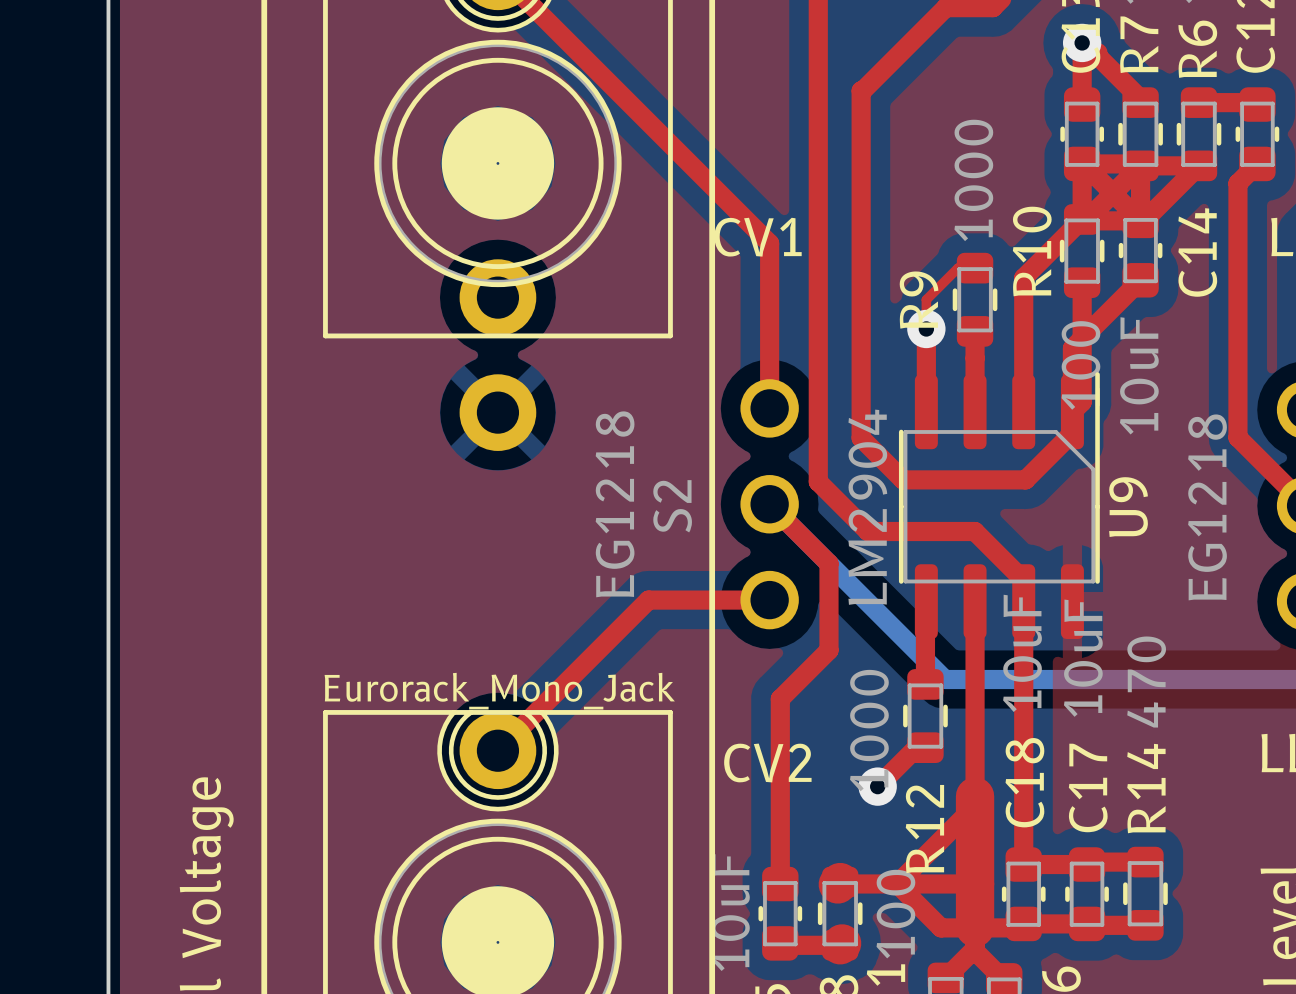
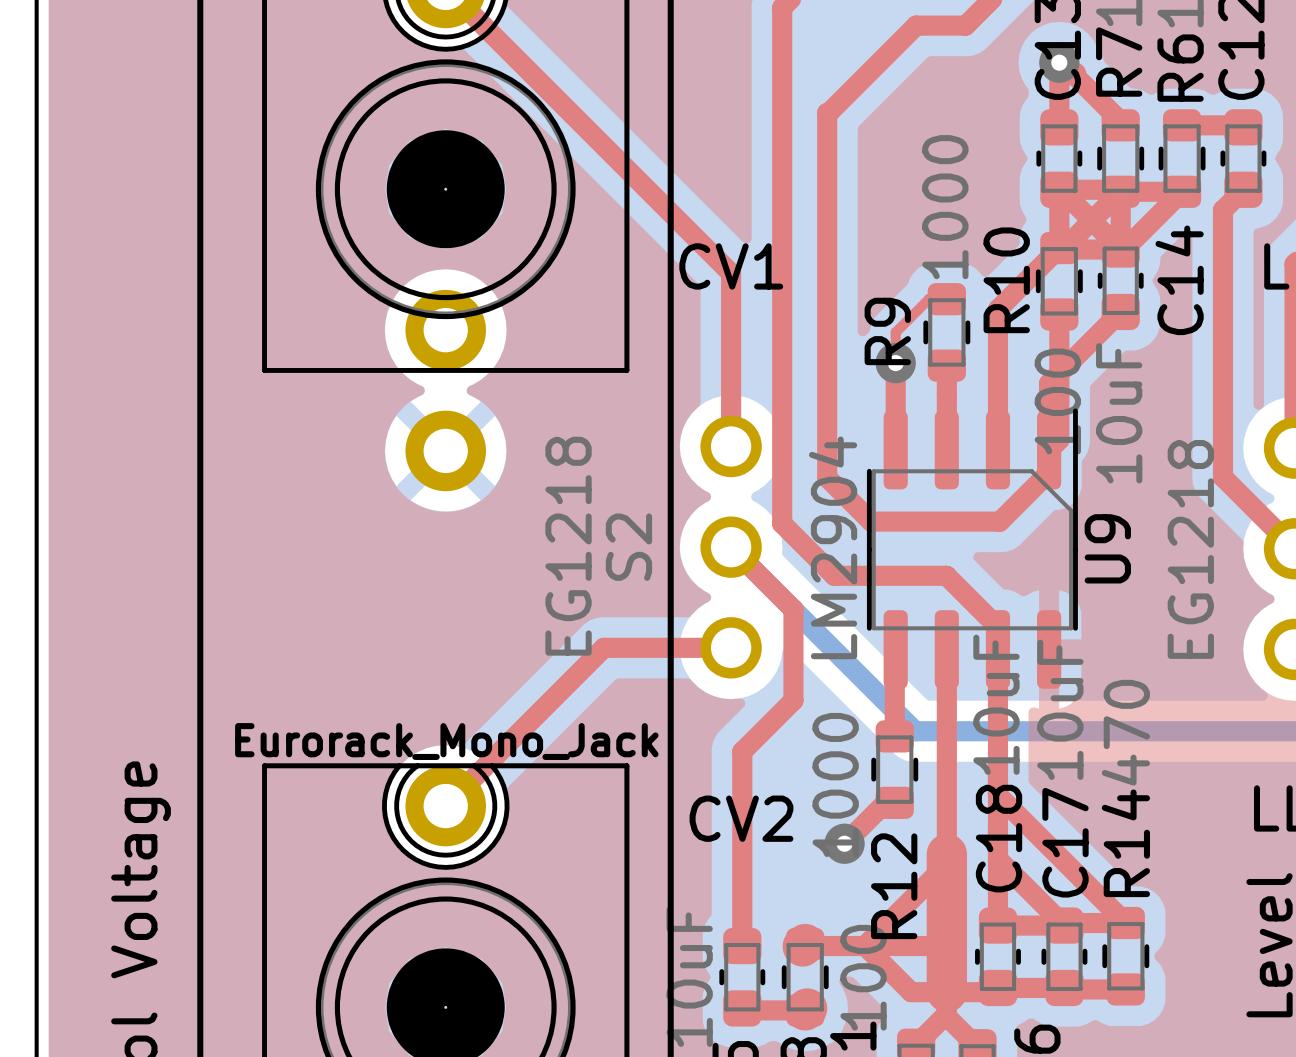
top track: none -> (997, 795) (1125, 923)
top track: none -> (997, 859) (1064, 925)

